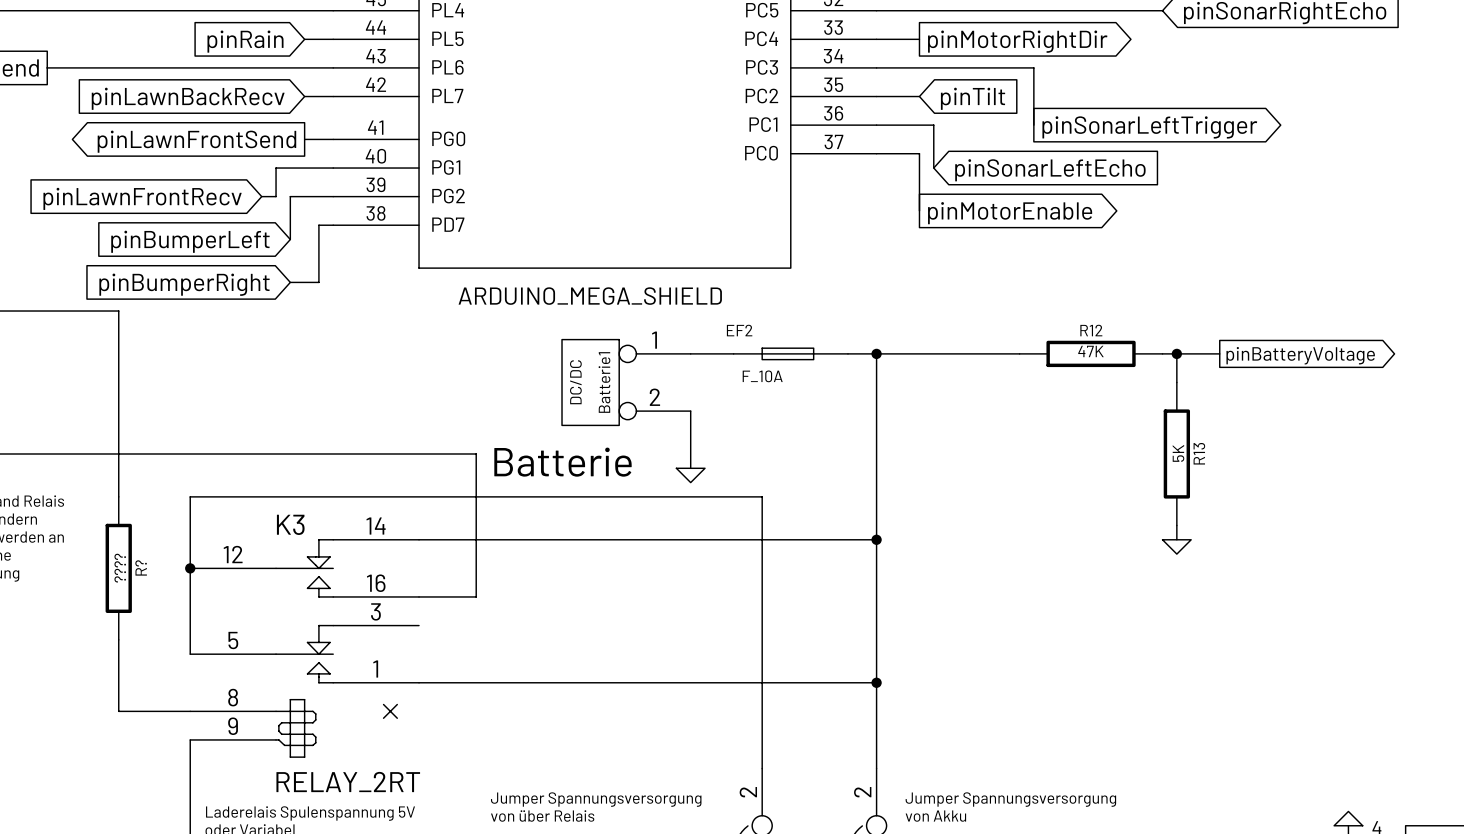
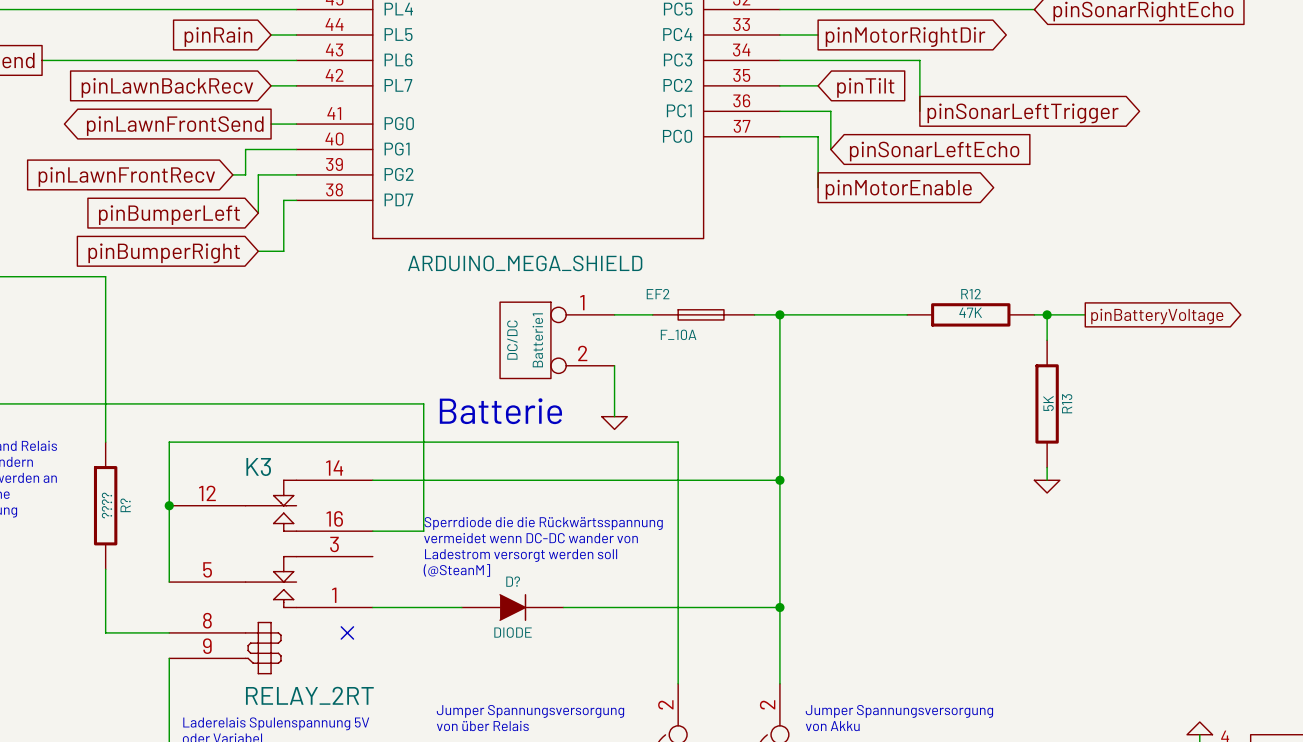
text: none -> Sperrdiode die die Rückwärtsspannung (543, 523)
text: none -> vermeidet wenn DC-DC wander von (531, 538)
text: none -> Ladestrom versorgt werden soll (521, 555)
text: none -> (@SteanM] (456, 570)
D?: none -> DIODE (512, 607)

